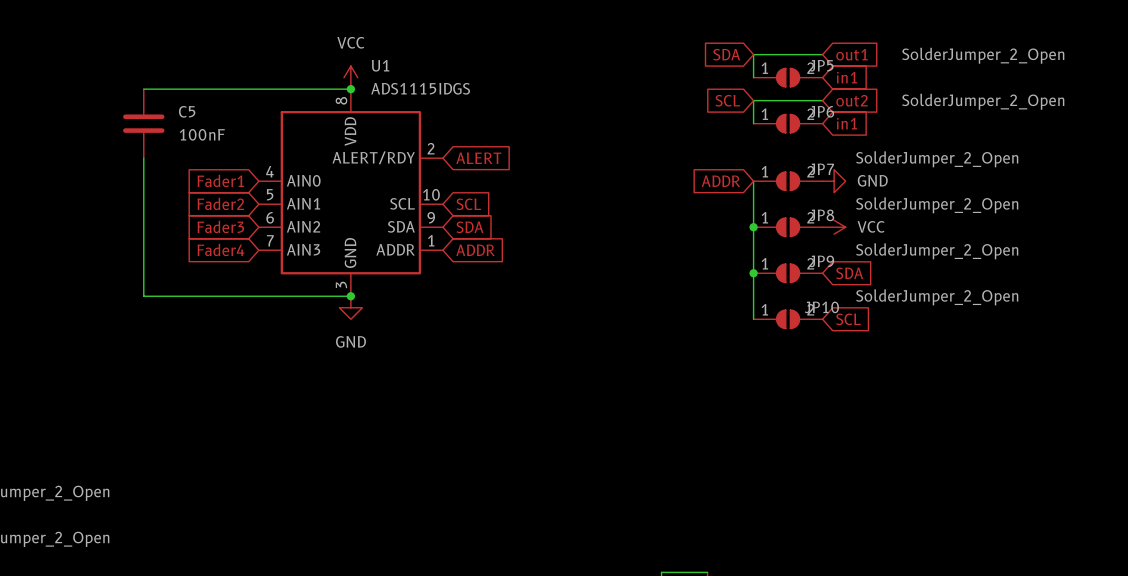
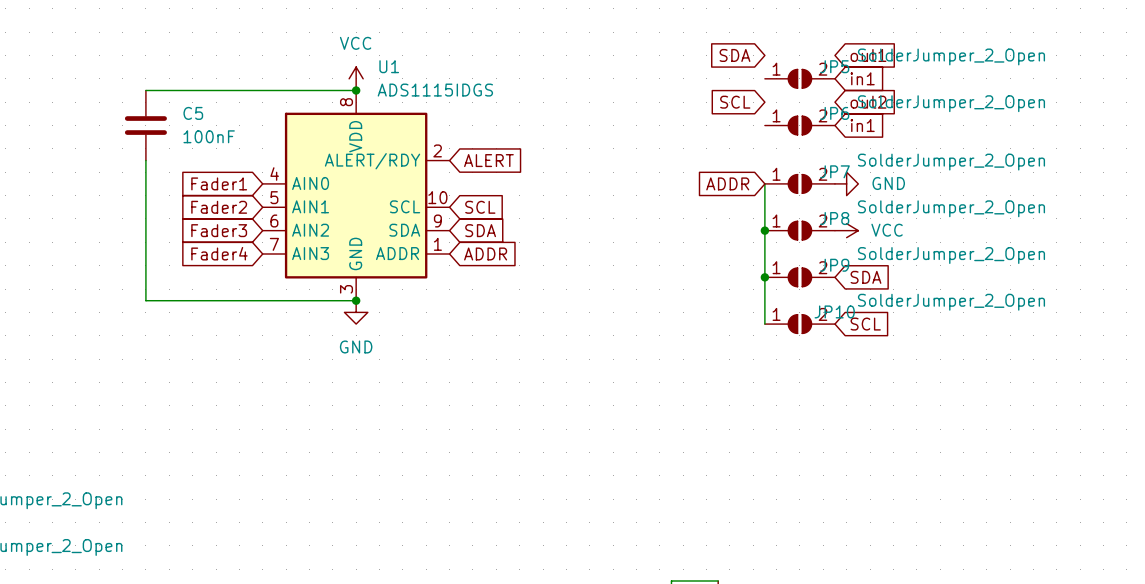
wire: (822, 54) (753, 54) (753, 77) -> none
JP5 value position: SolderJumper_2_Open (983, 55) -> SolderJumper_2_Open (951, 56)
wire: (822, 100) (753, 100) (753, 123) -> none
JP6 value position: SolderJumper_2_Open (983, 101) -> SolderJumper_2_Open (951, 103)

